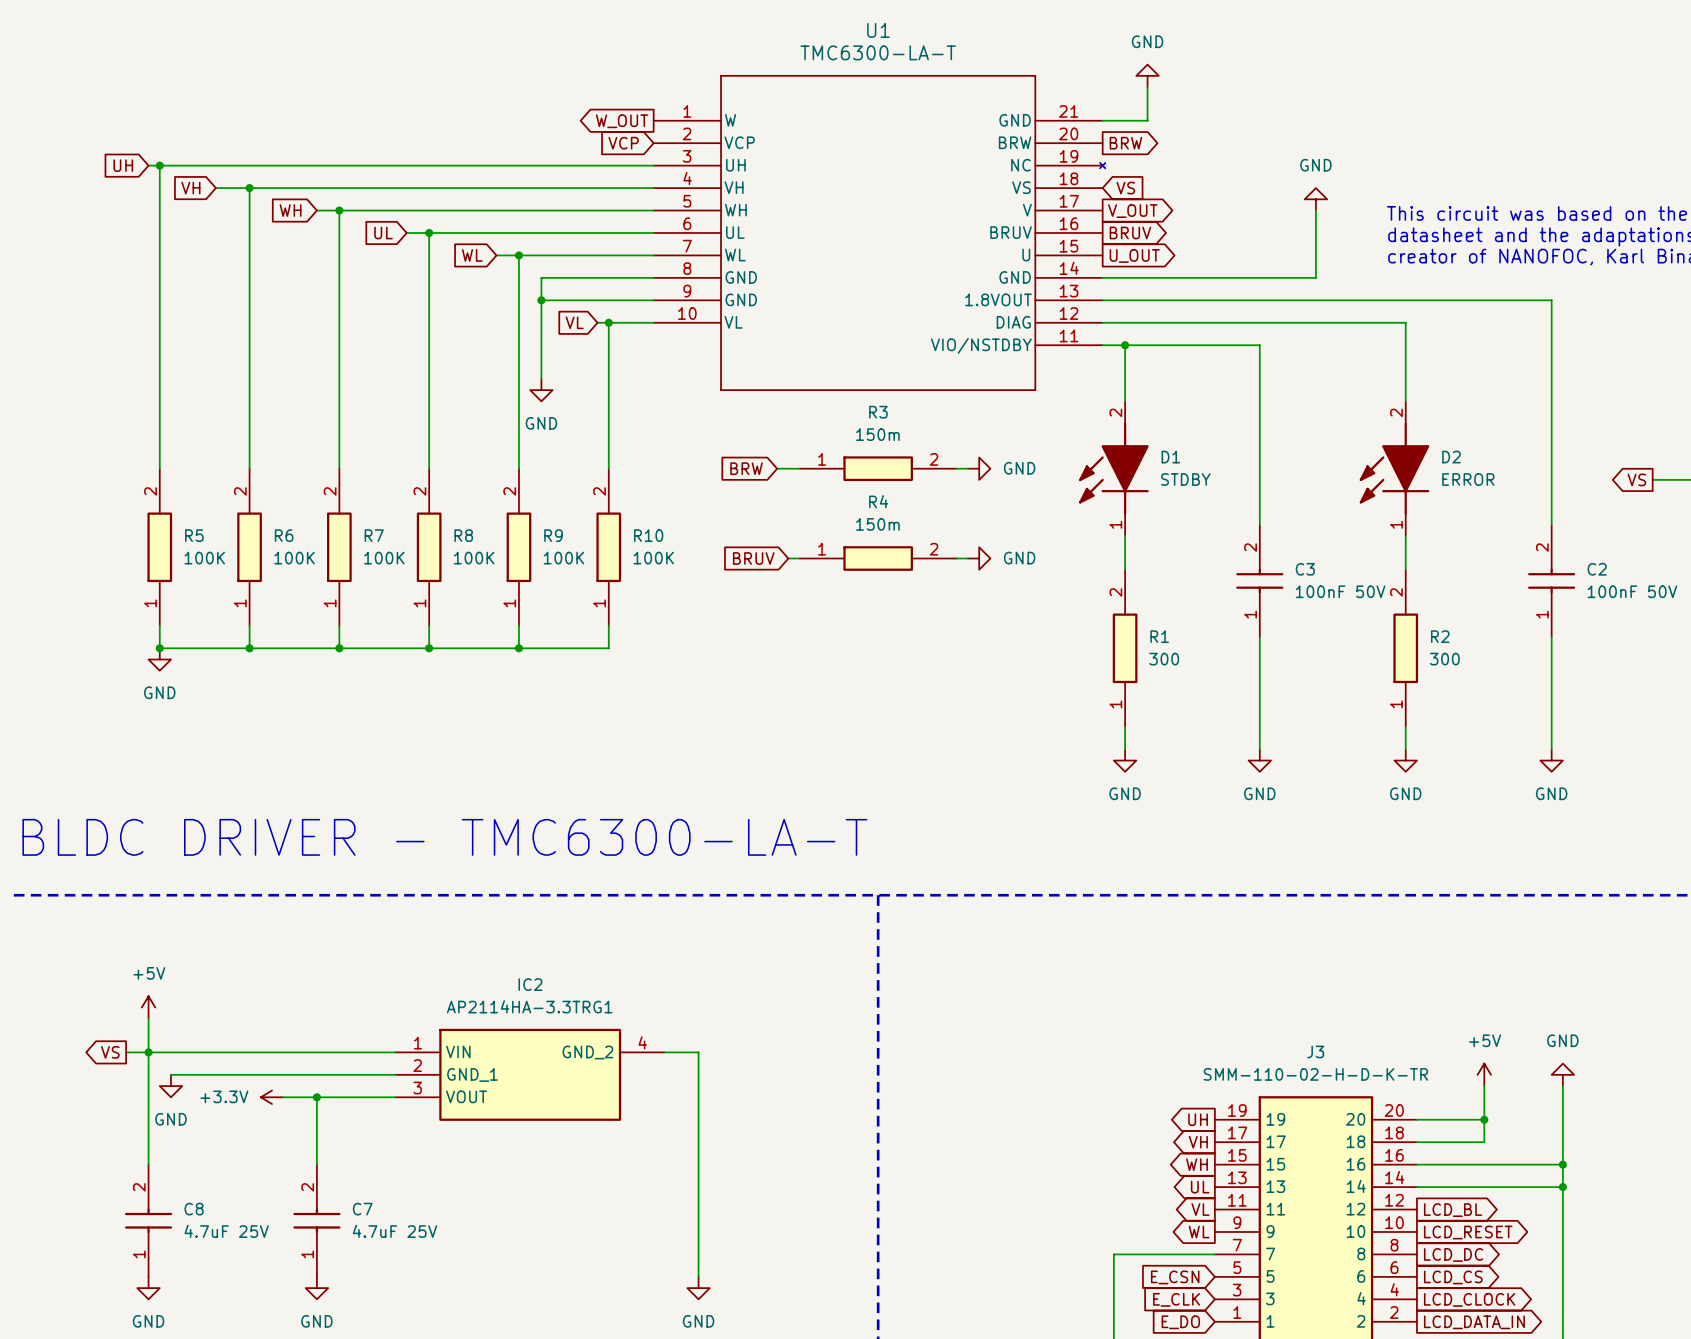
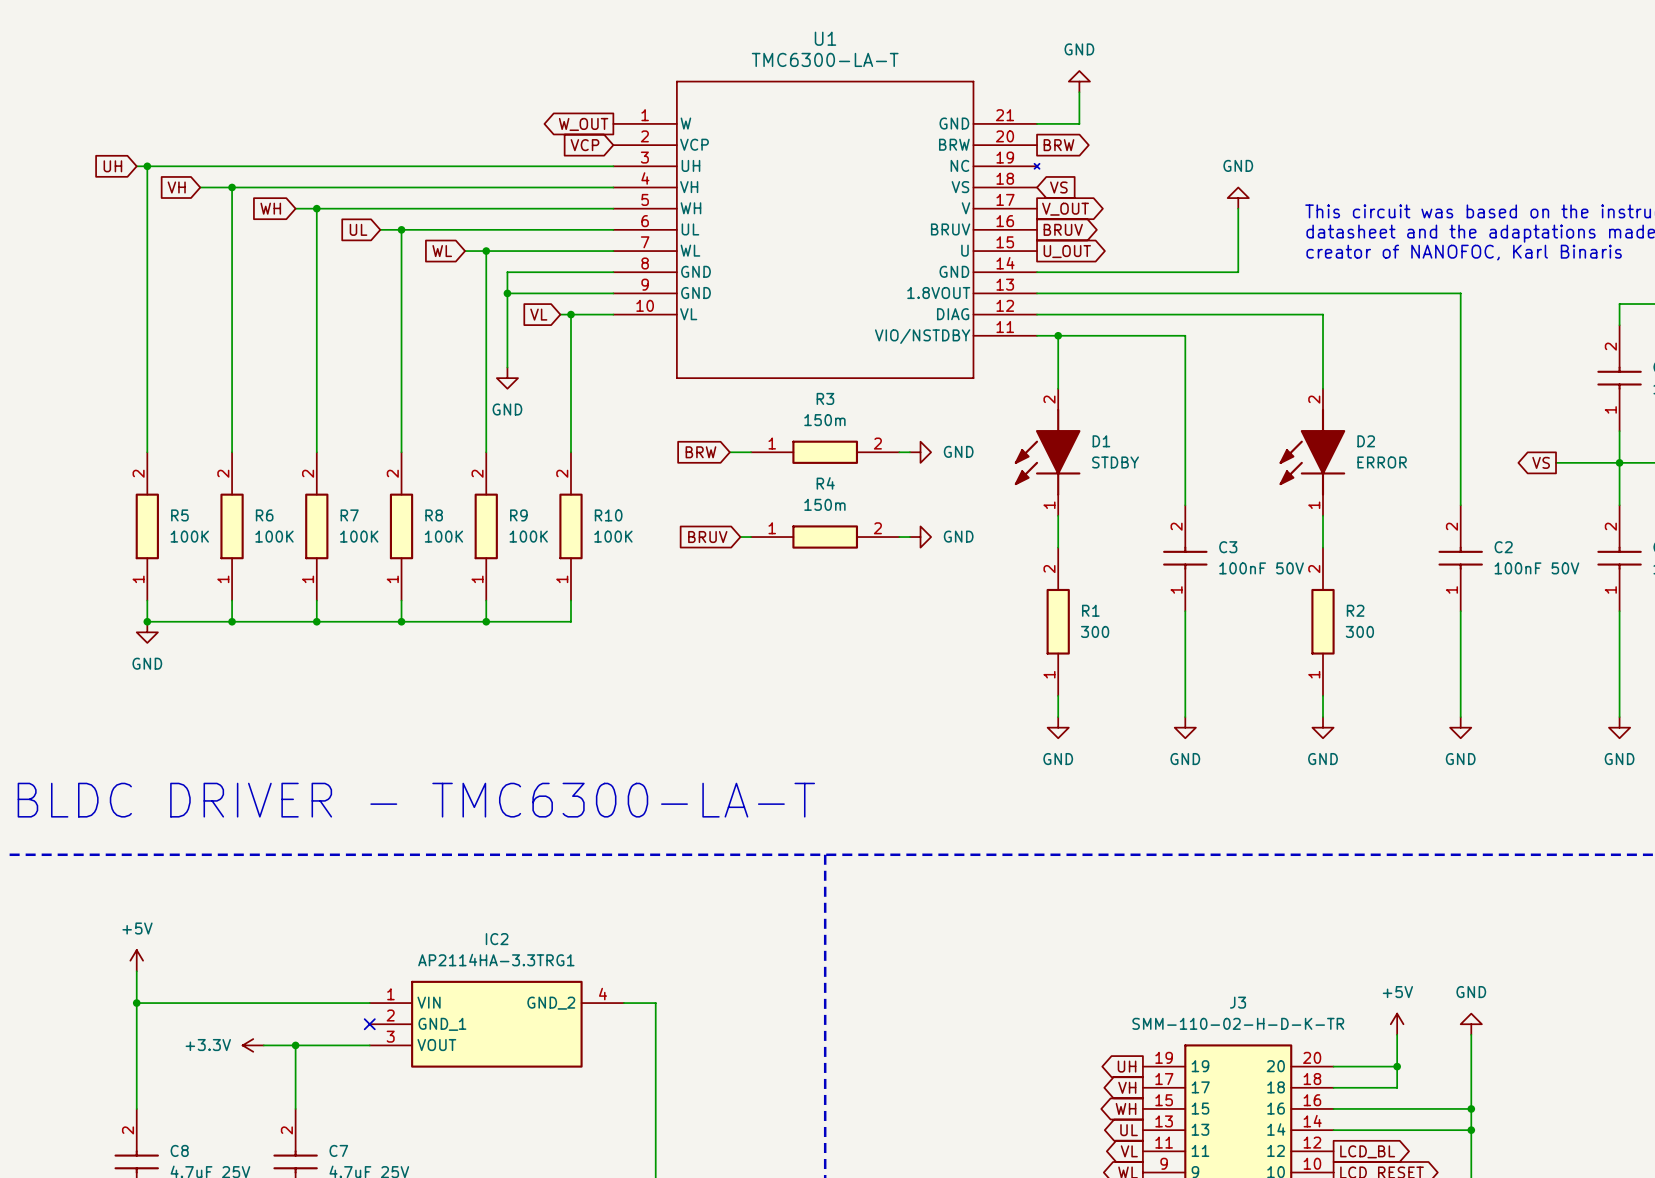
global label: VS (110, 1052) -> none
wire: (126, 1052) (148, 1052) -> none
wire: (171, 1074) (395, 1074) -> none
no-connect mark: none -> (369, 1024)
power symbol: GND (171, 1086) -> none

